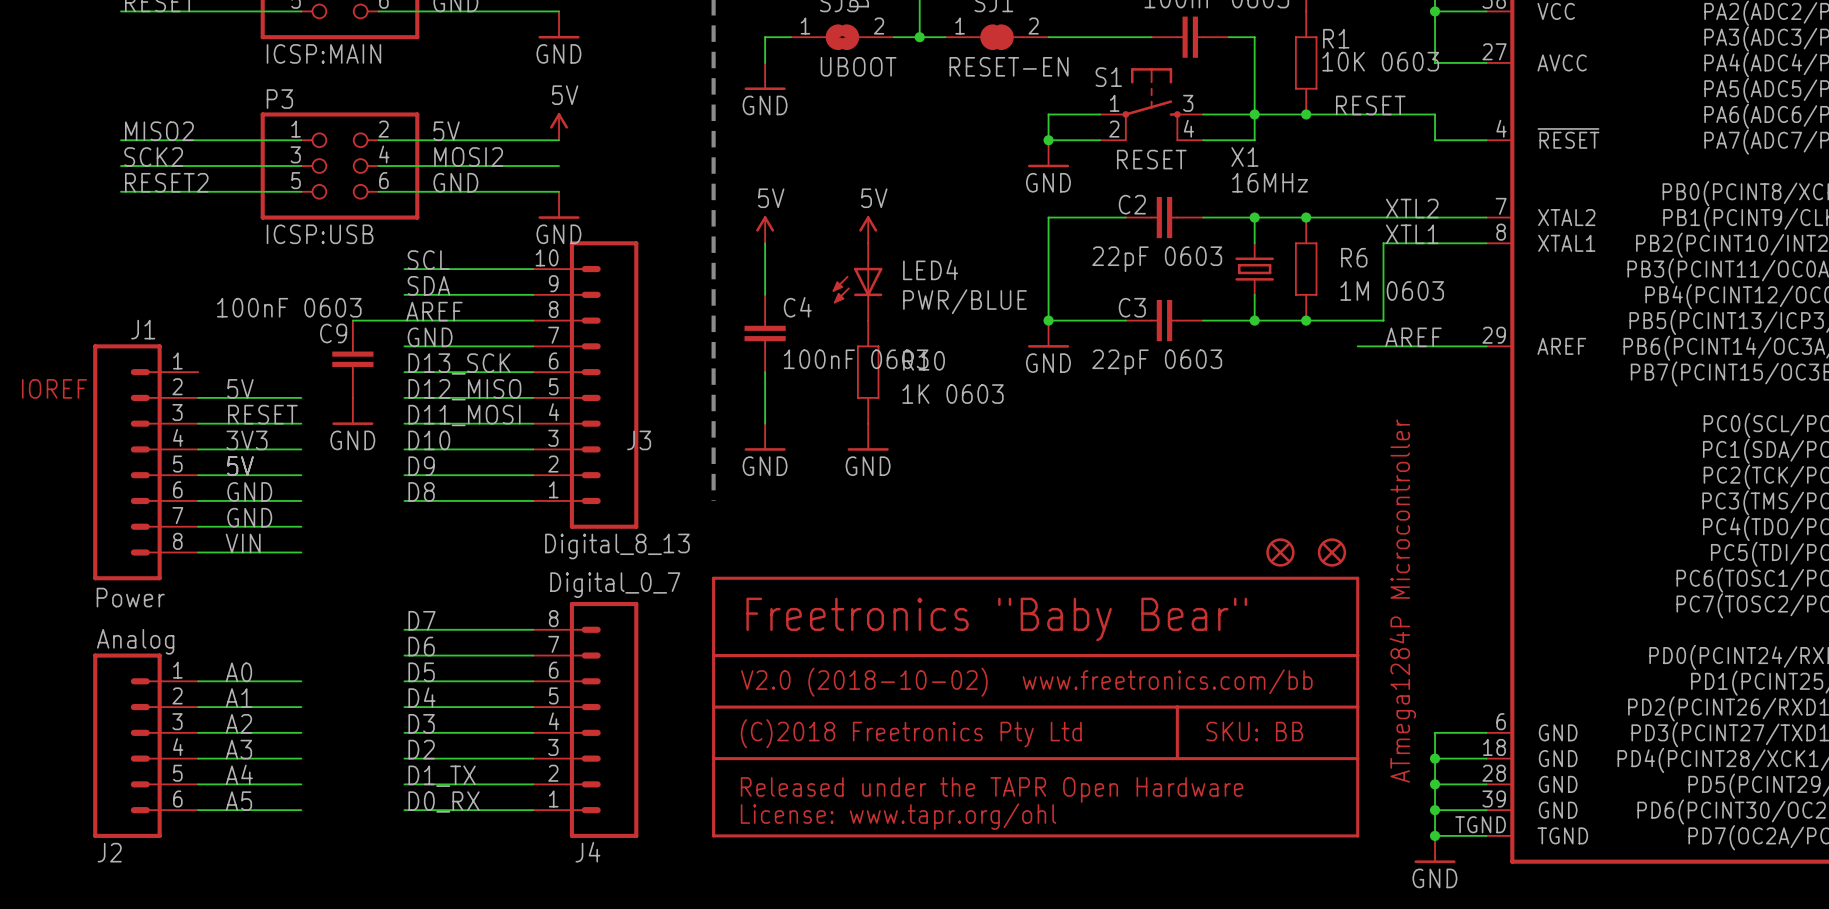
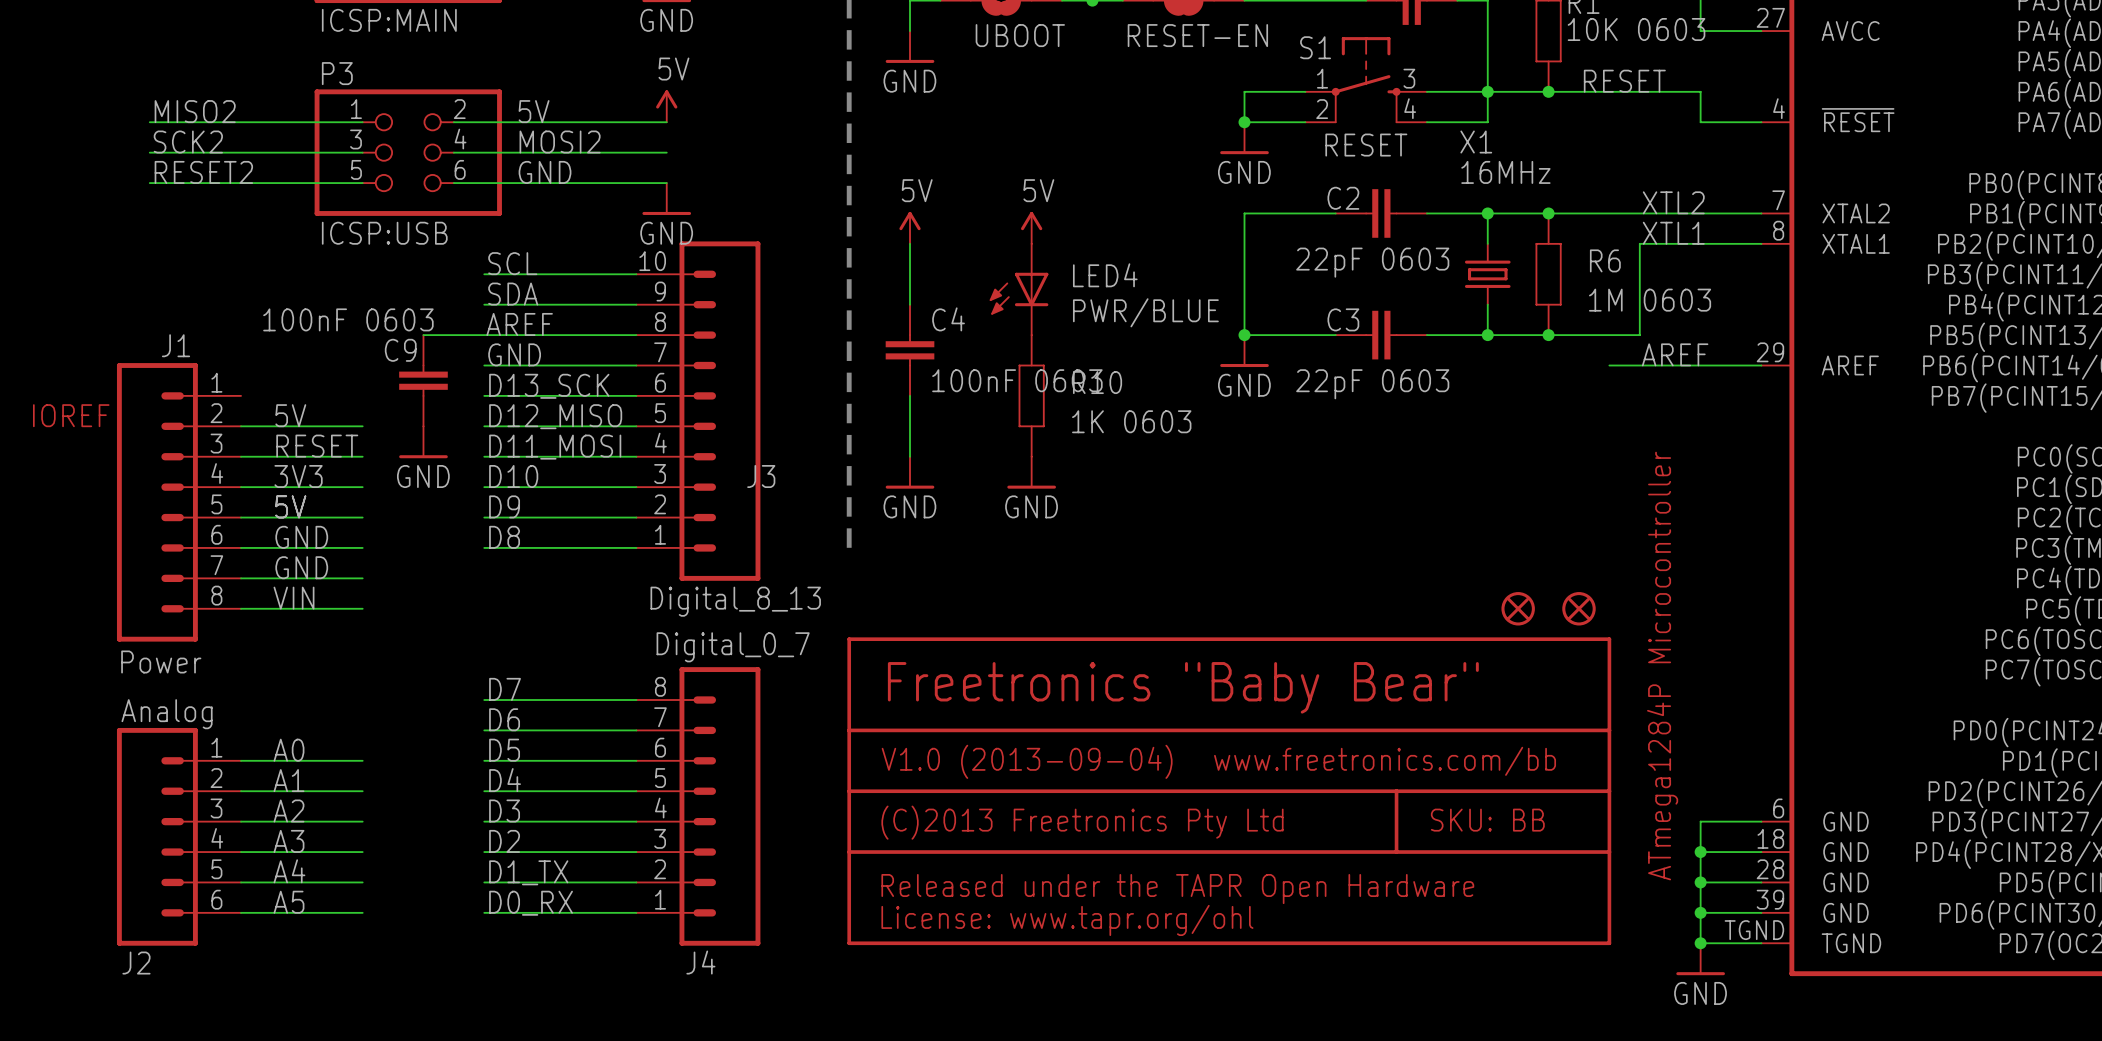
text: V2.0 (2018-10-02) (864, 682) -> V1.0 (2013-09-04) (1027, 761)
text: (C)2018 Freetronics Pty Ltd (911, 733) -> (C)2013 Freetronics Pty Ltd (1082, 822)

